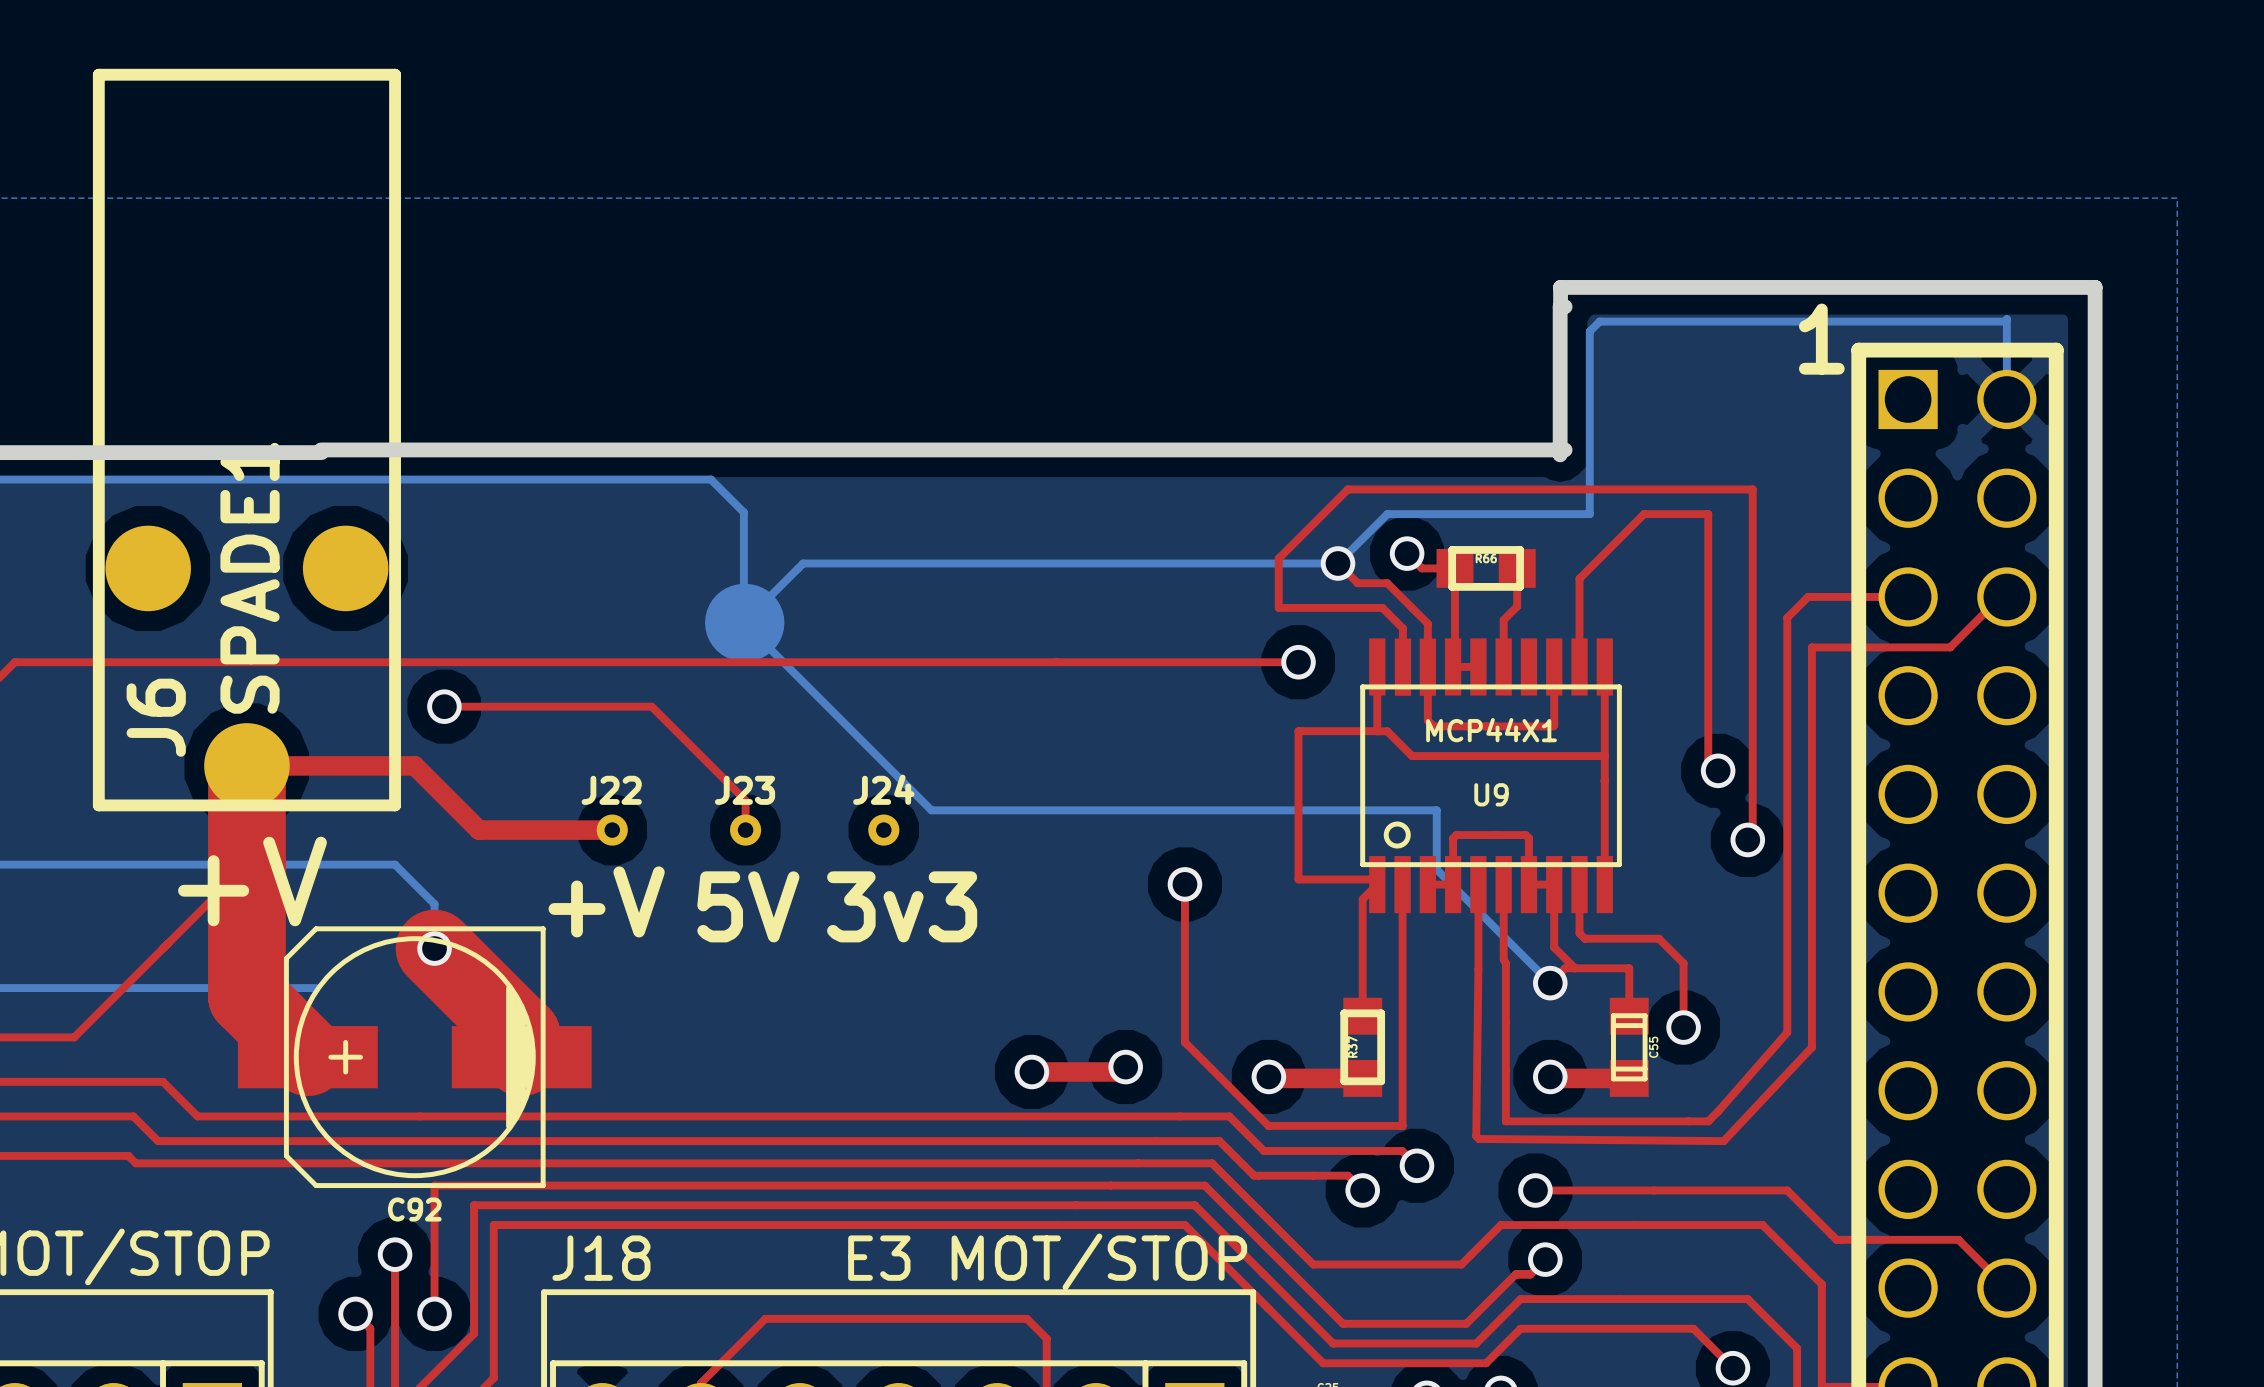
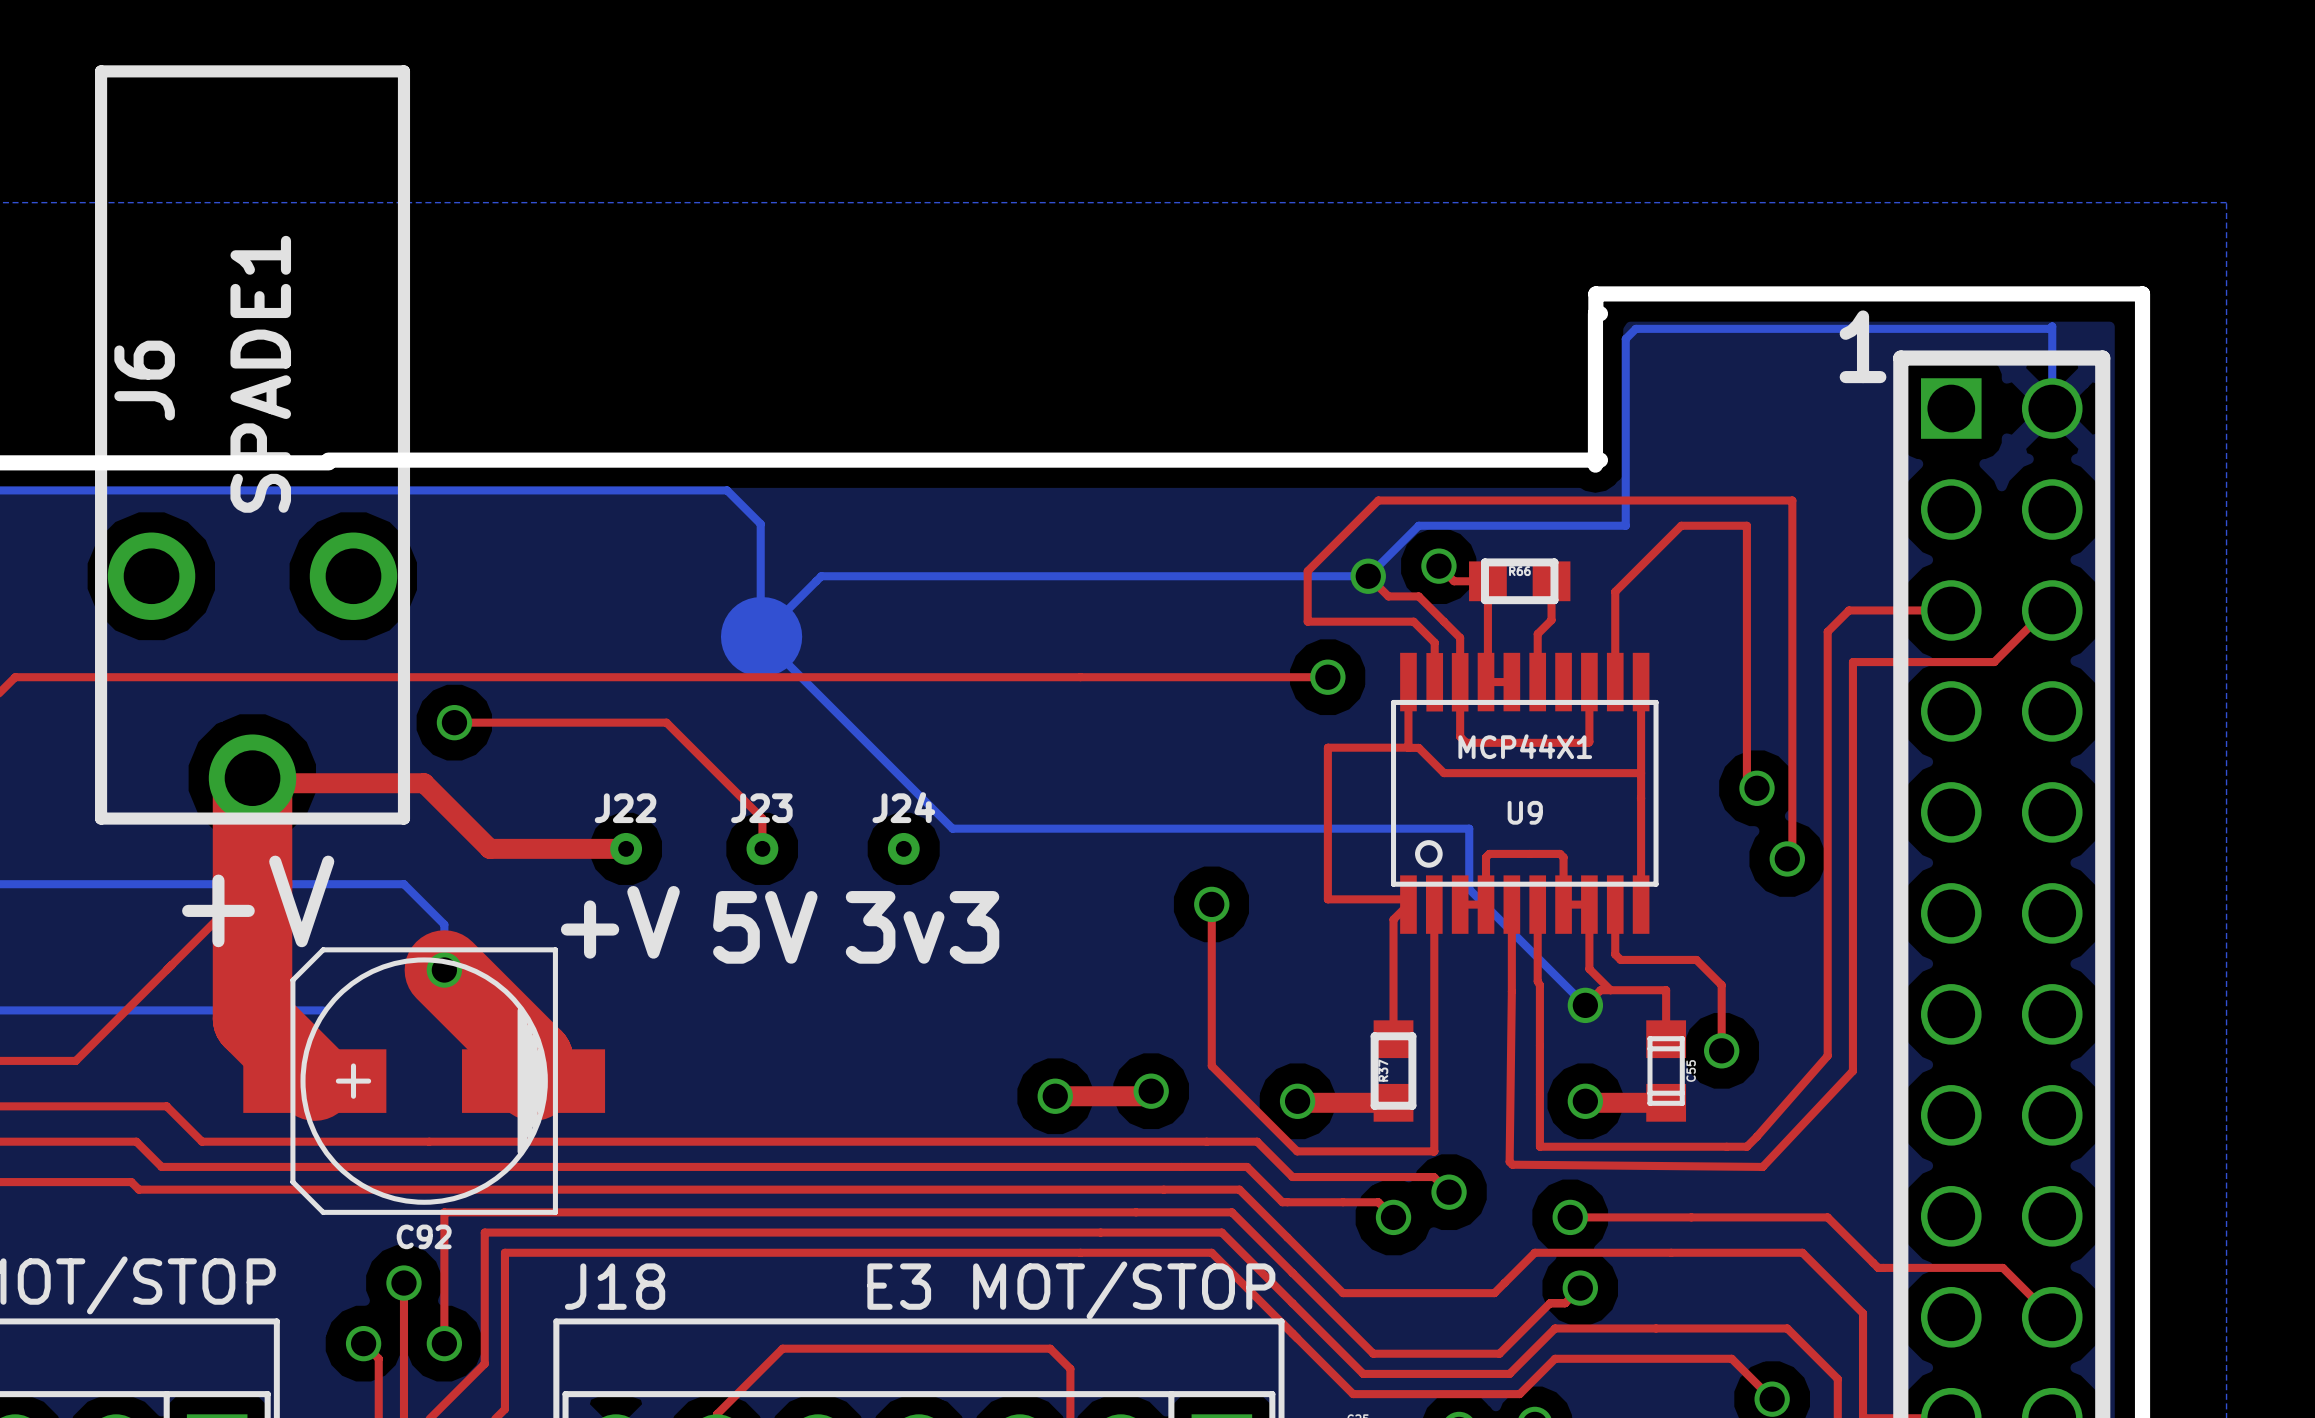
J6 footprint: [92, 68, 401, 812] -> [95, 65, 411, 825]
J6 value position: SPADE1 (250, 578) -> SPADE1 (260, 374)
J6 name position: J6 (156, 717) -> J6 (144, 380)

